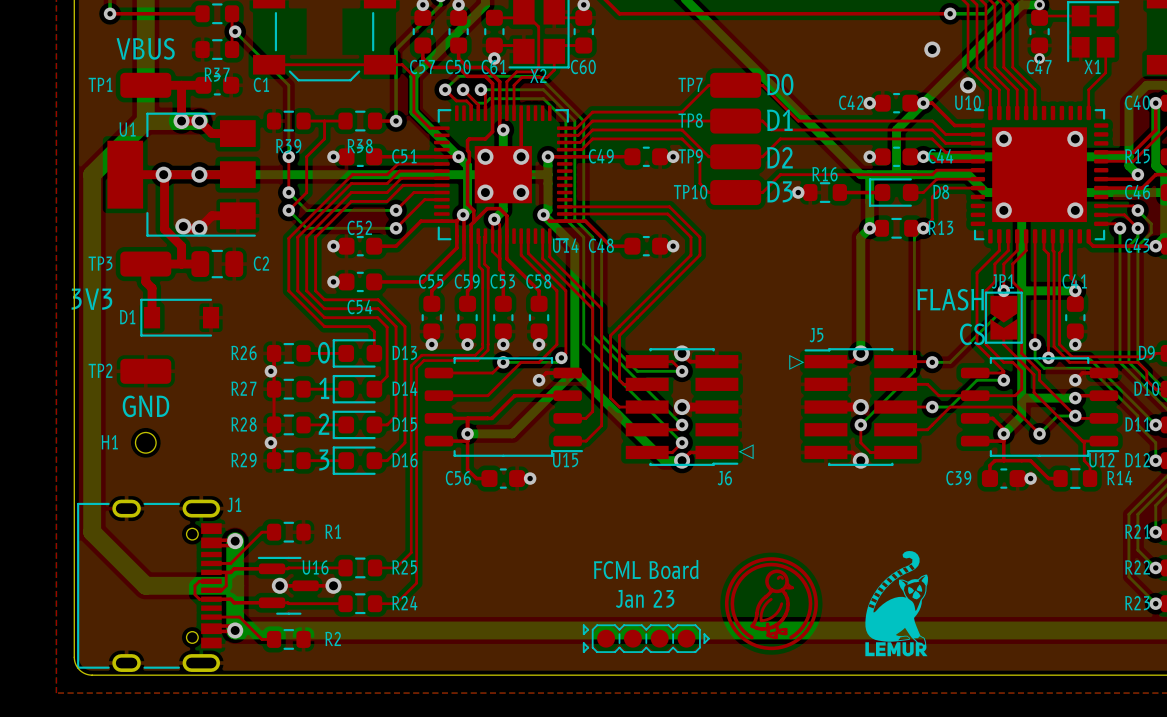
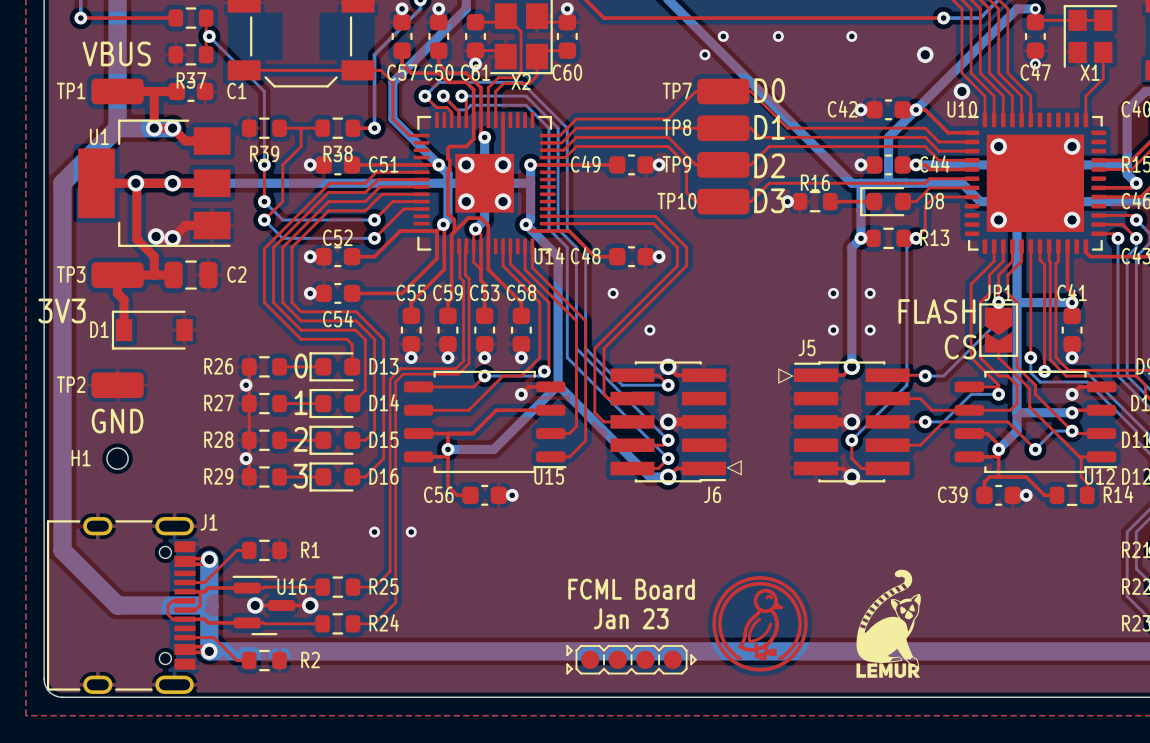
via: none -> (723, 36)
via: none -> (778, 36)
via: none -> (851, 36)
via: none -> (704, 54)
via: none -> (613, 293)
via: none -> (833, 293)
via: none -> (870, 293)
via: none -> (649, 330)
via: none -> (833, 330)
via: none -> (870, 330)
via: none -> (374, 532)
via: none -> (411, 532)

